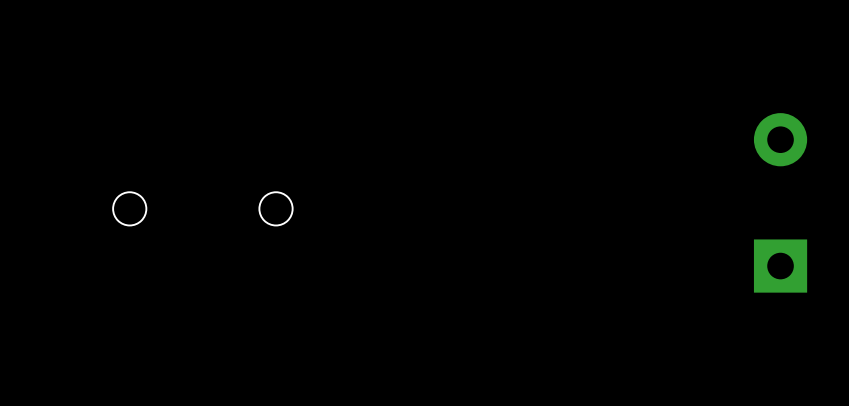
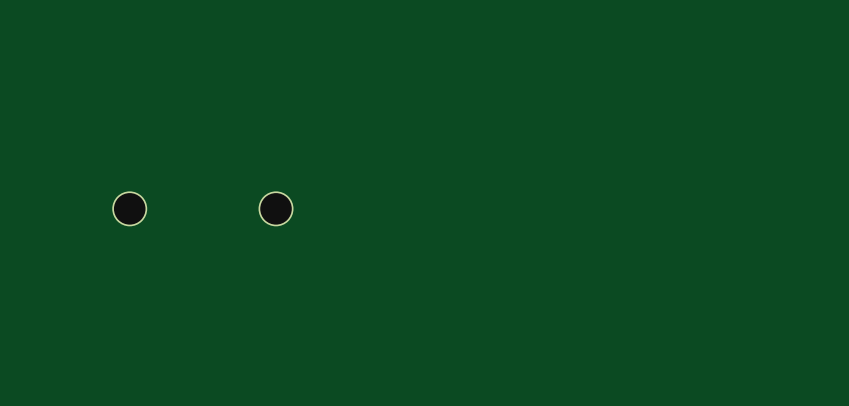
part: (780, 202) -> none

